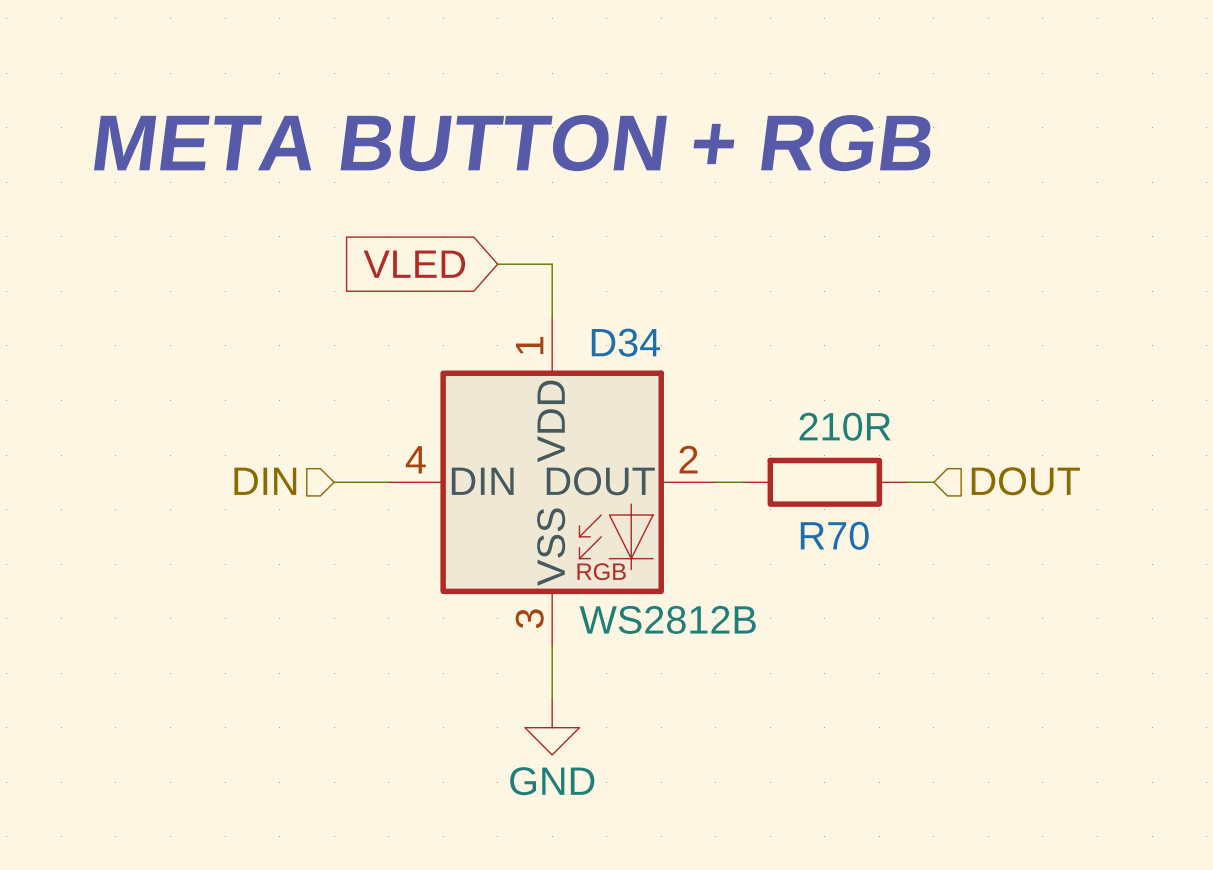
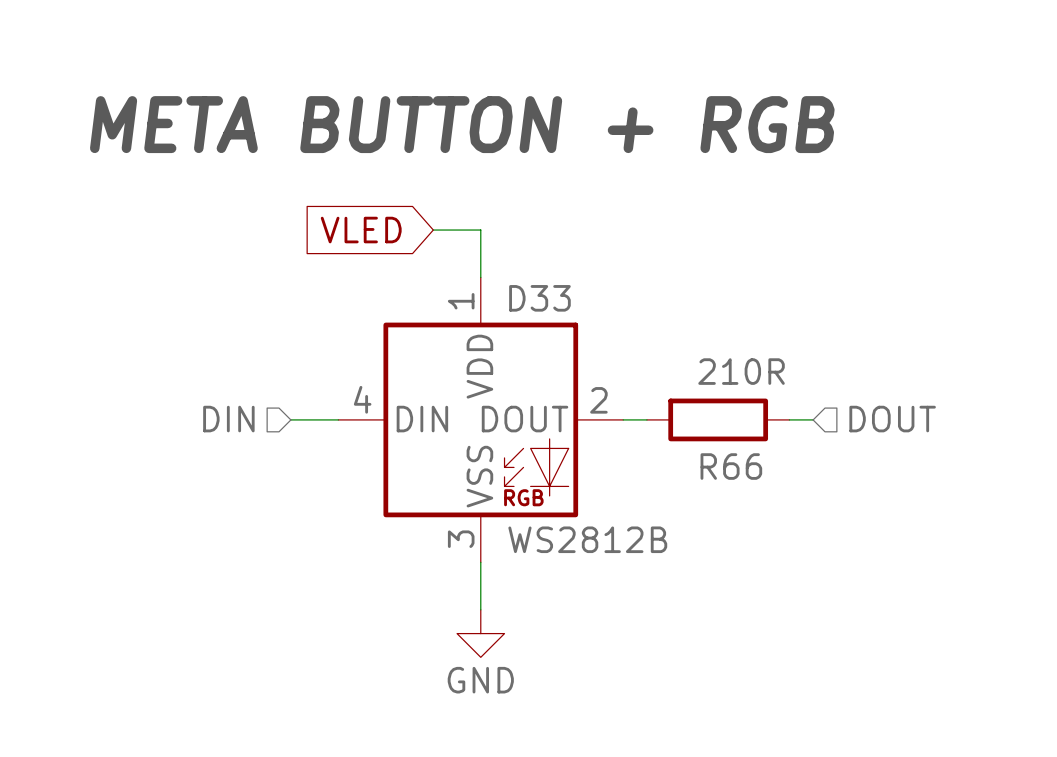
D34 name: D34 (625, 342) -> D33 (539, 298)
R70 name: R70 (834, 535) -> R66 (731, 466)

